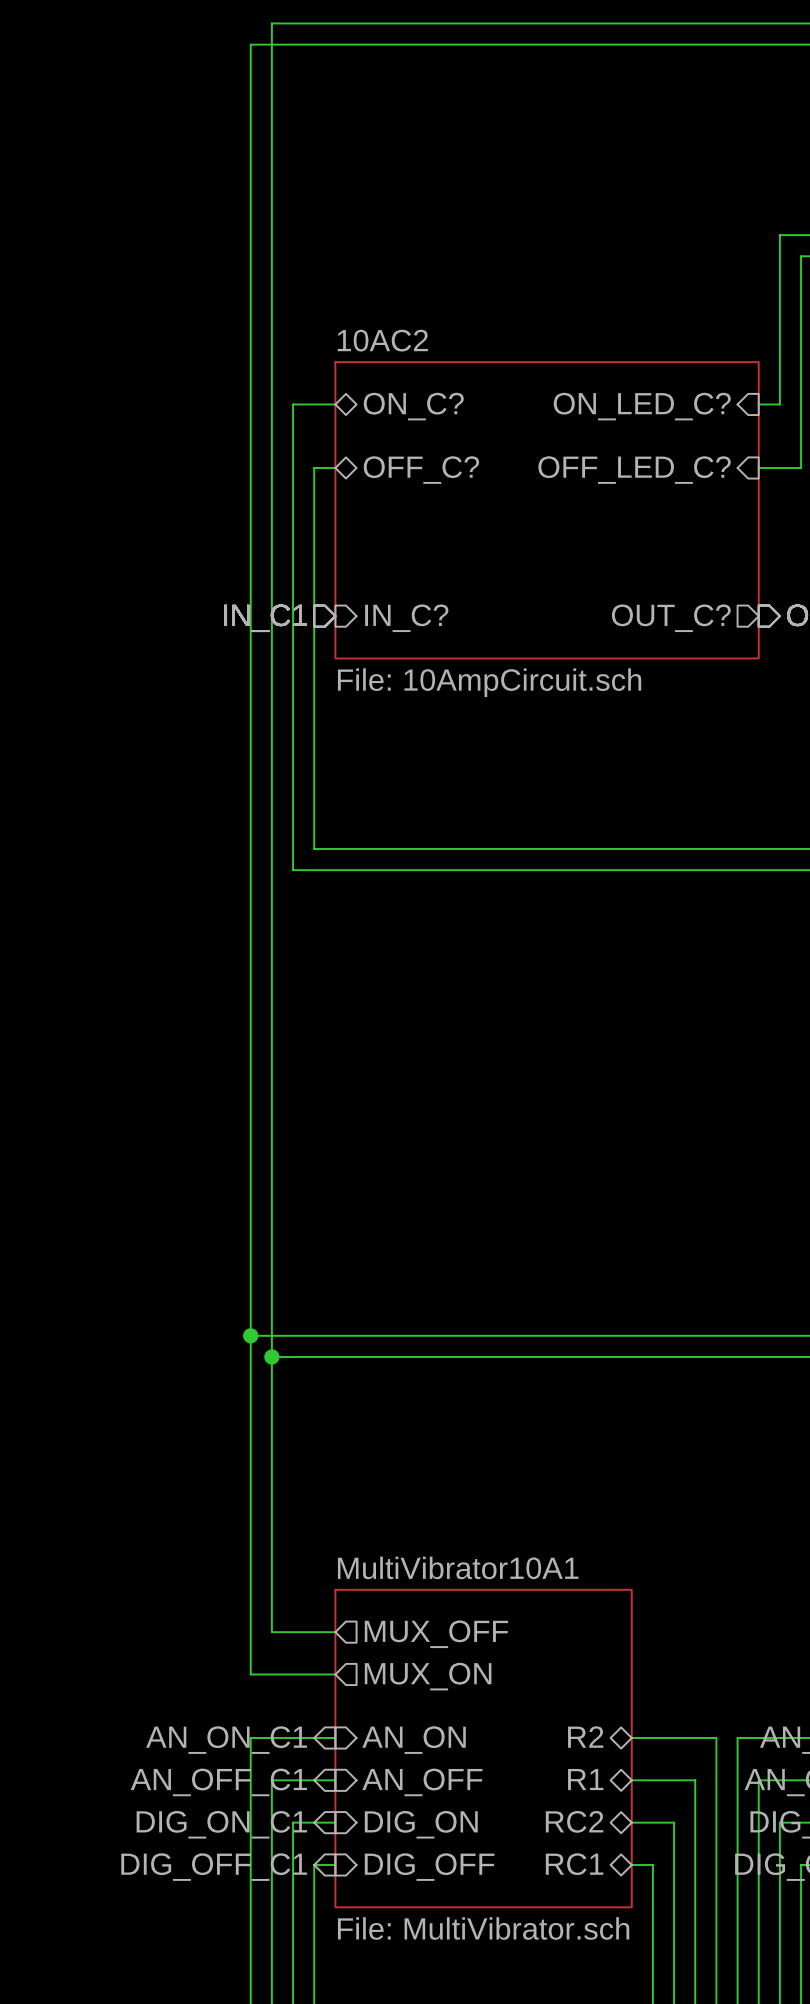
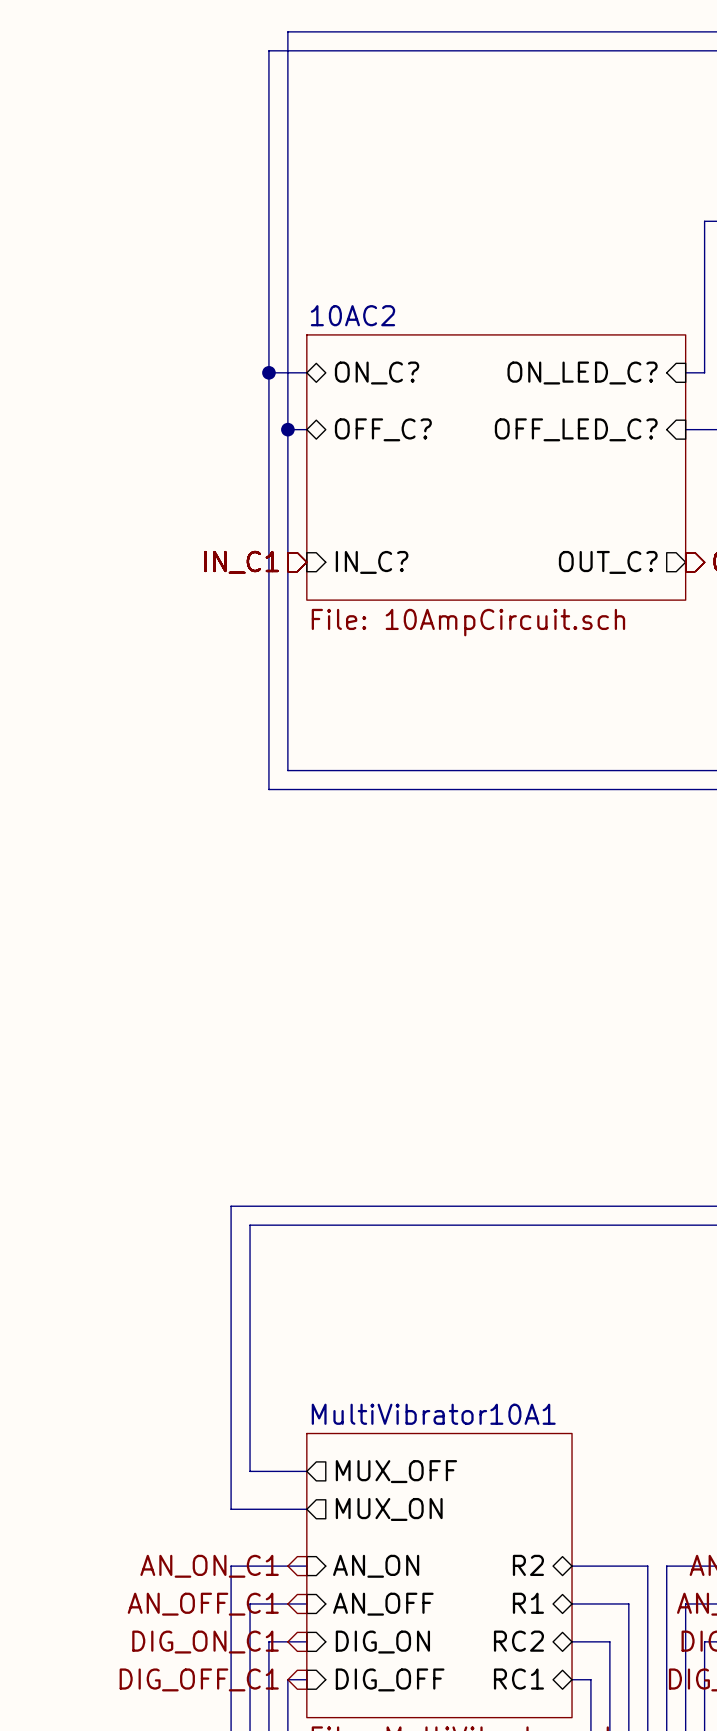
wire: (314, 23) (271, 23) (271, 1356) -> (287, 31) (287, 429)
wire: (293, 44) (250, 44) (250, 1335) -> (268, 50) (268, 372)
junction: none -> (268, 372)
junction: none -> (287, 429)
junction: (250, 1335) -> none
junction: (271, 1356) -> none

